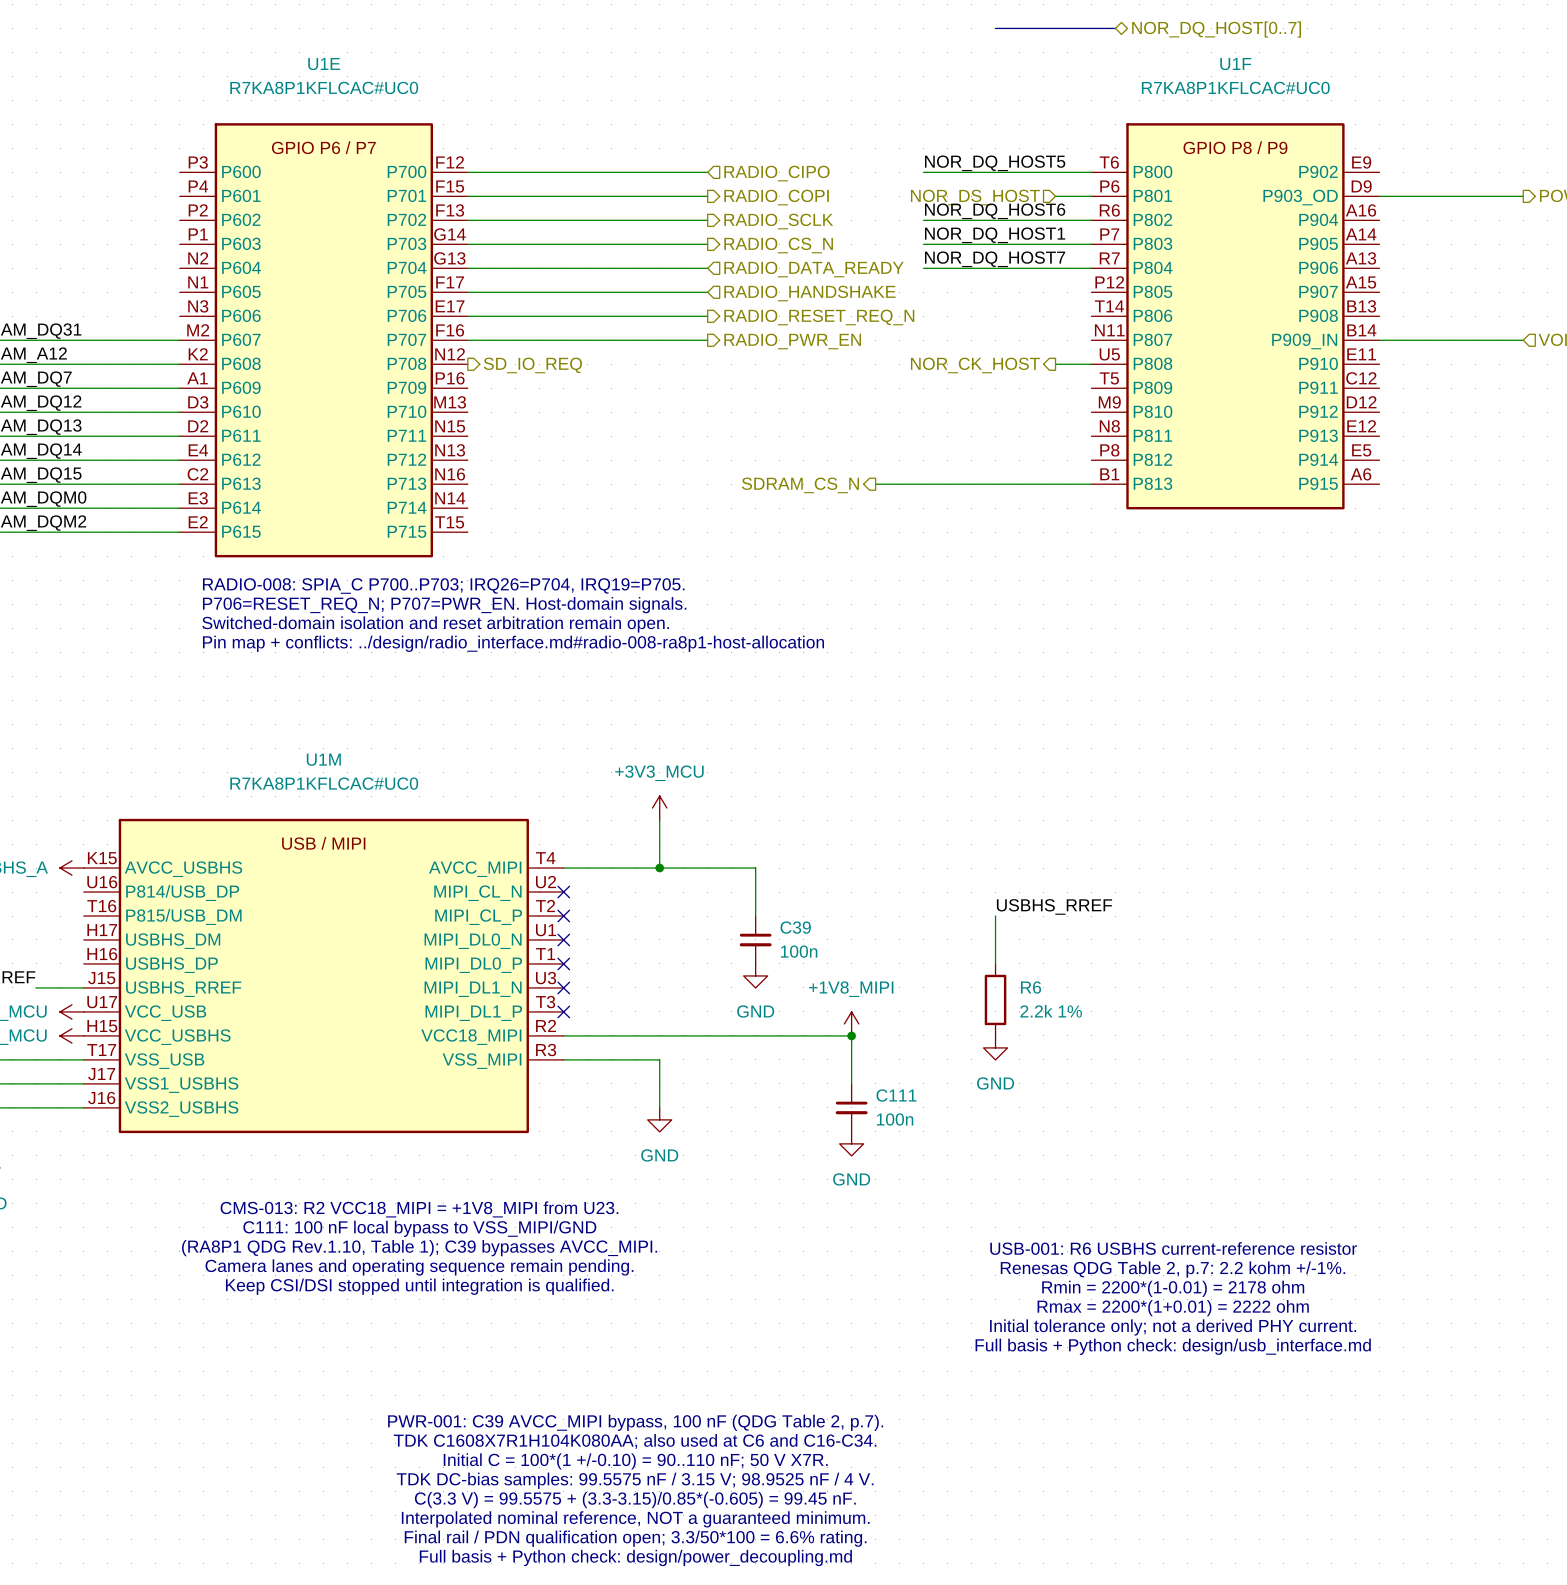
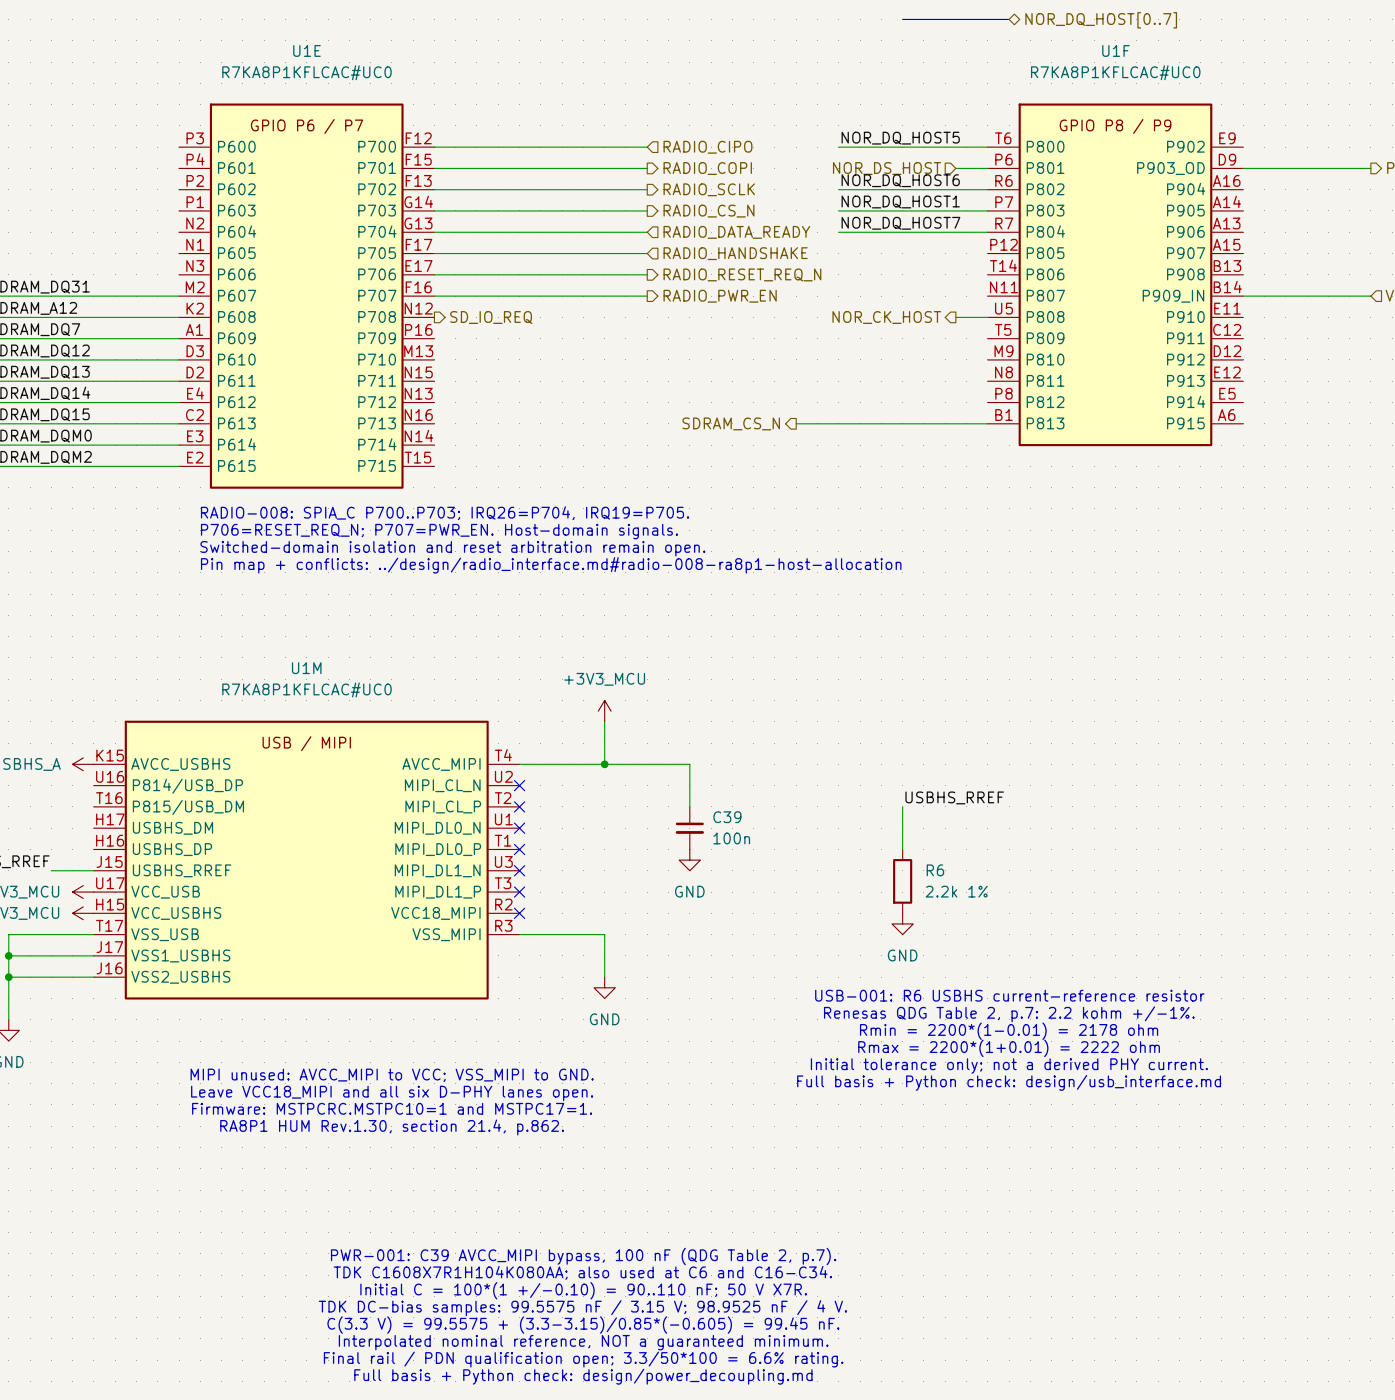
power symbol: +1V8_MIPI (851, 1023) -> none
wire: (563, 1035) (851, 1035) (851, 1083) -> none
no-connect mark: none -> (519, 913)
junction: (851, 1035) -> none
C111: 100n (851, 1107) -> none
power symbol: GND (851, 1143) -> none
text: CMS-013: R2 VCC18_MIPI = +1V8_MIPI from U23. (419, 1209) -> none
text: none -> MIPI unused: AVCC_MIPI to VCC; VSS_MIPI to GND. (392, 1075)
text: C111: 100 nF local bypass to VSS_MIPI/GND (419, 1228) -> none
text: none -> Leave VCC18_MIPI and all six D-PHY lanes open. (392, 1093)
text: (RA8P1 QDG Rev.1.10, Table 1); C39 bypasses AVCC_MIPI. (419, 1248) -> none
text position: USB-001: R6 USBHS current-reference resistor (1173, 1248) -> USB-001: R6 USBHS current-reference resistor (1009, 995)
text: none -> Firmware: MSTPCRC.MSTPC10=1 and MSTPC17=1. (392, 1108)
text: Camera lanes and operating sequence remain pending. (419, 1267) -> none
text position: Renesas QDG Table 2, p.7: 2.2 kohm +/-1%. (1172, 1269) -> Renesas QDG Table 2, p.7: 2.2 kohm +/-1%. (1009, 1014)
text: none -> RA8P1 HUM Rev.1.30, section 21.4, p.862. (392, 1127)
text: Keep CSI/DSI stopped until integration is qualified. (419, 1286) -> none
text position: Rmin = 2200*(1-0.01) = 2178 ohm (1173, 1288) -> Rmin = 2200*(1-0.01) = 2178 ohm (1009, 1031)
text position: Rmax = 2200*(1+0.01) = 2222 ohm (1173, 1308) -> Rmax = 2200*(1+0.01) = 2222 ohm (1009, 1048)
text position: Initial tolerance only; not a derived PHY current. (1173, 1327) -> Initial tolerance only; not a derived PHY current. (1009, 1066)
text position: Full basis + Python check: design/usb_interface.md (1173, 1346) -> Full basis + Python check: design/usb_interface.md (1009, 1082)

